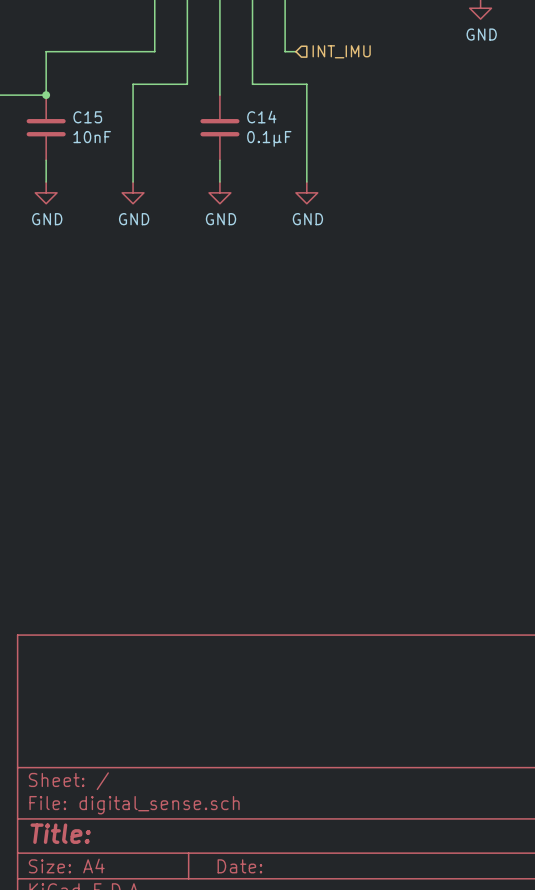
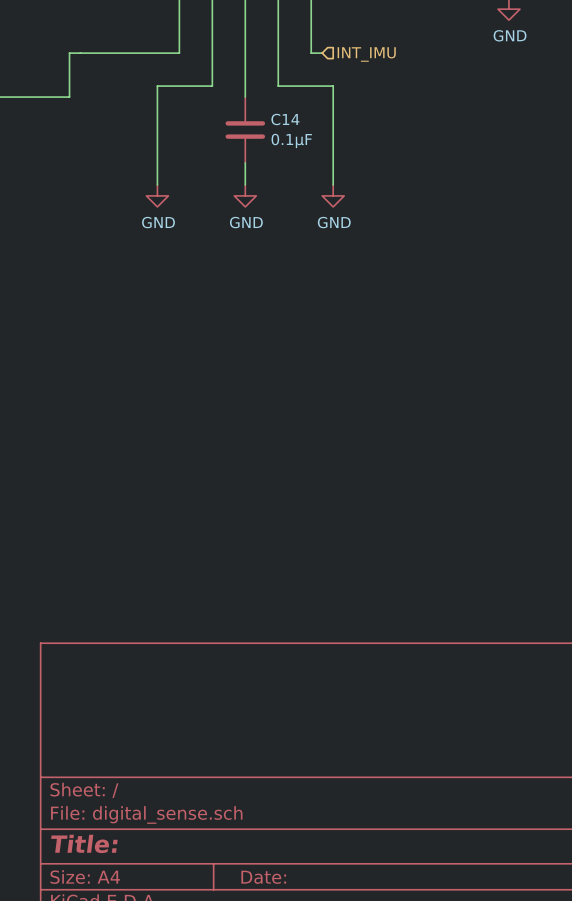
junction: (46, 95) -> none
C15: 10nF (46, 127) -> none
wire: (46, 160) (46, 182) -> none
power symbol: GND (46, 192) -> none

